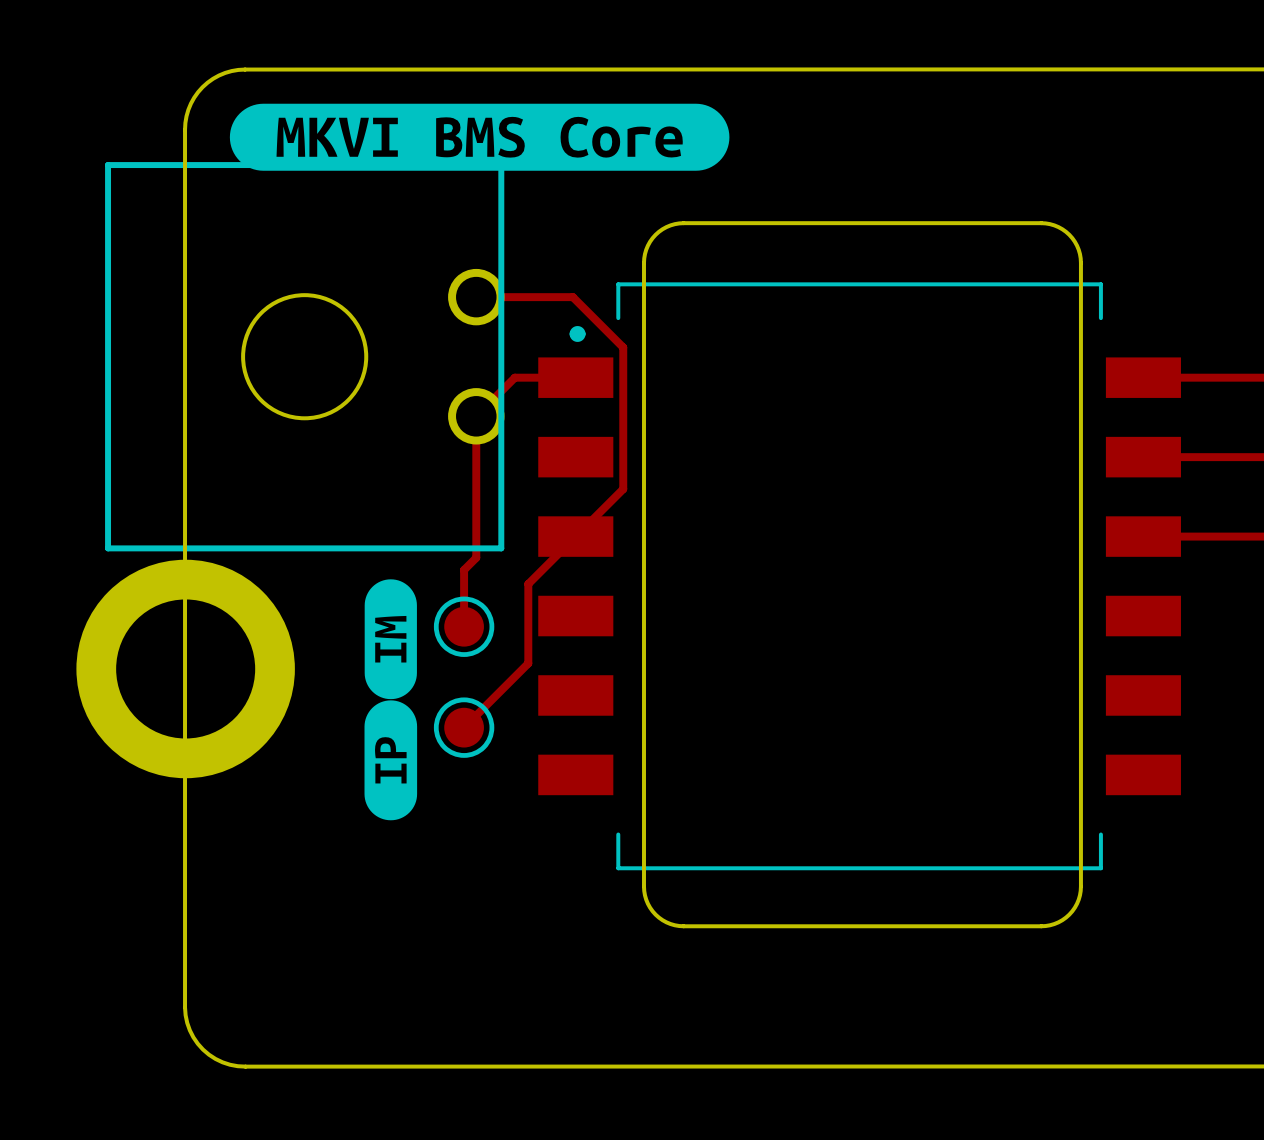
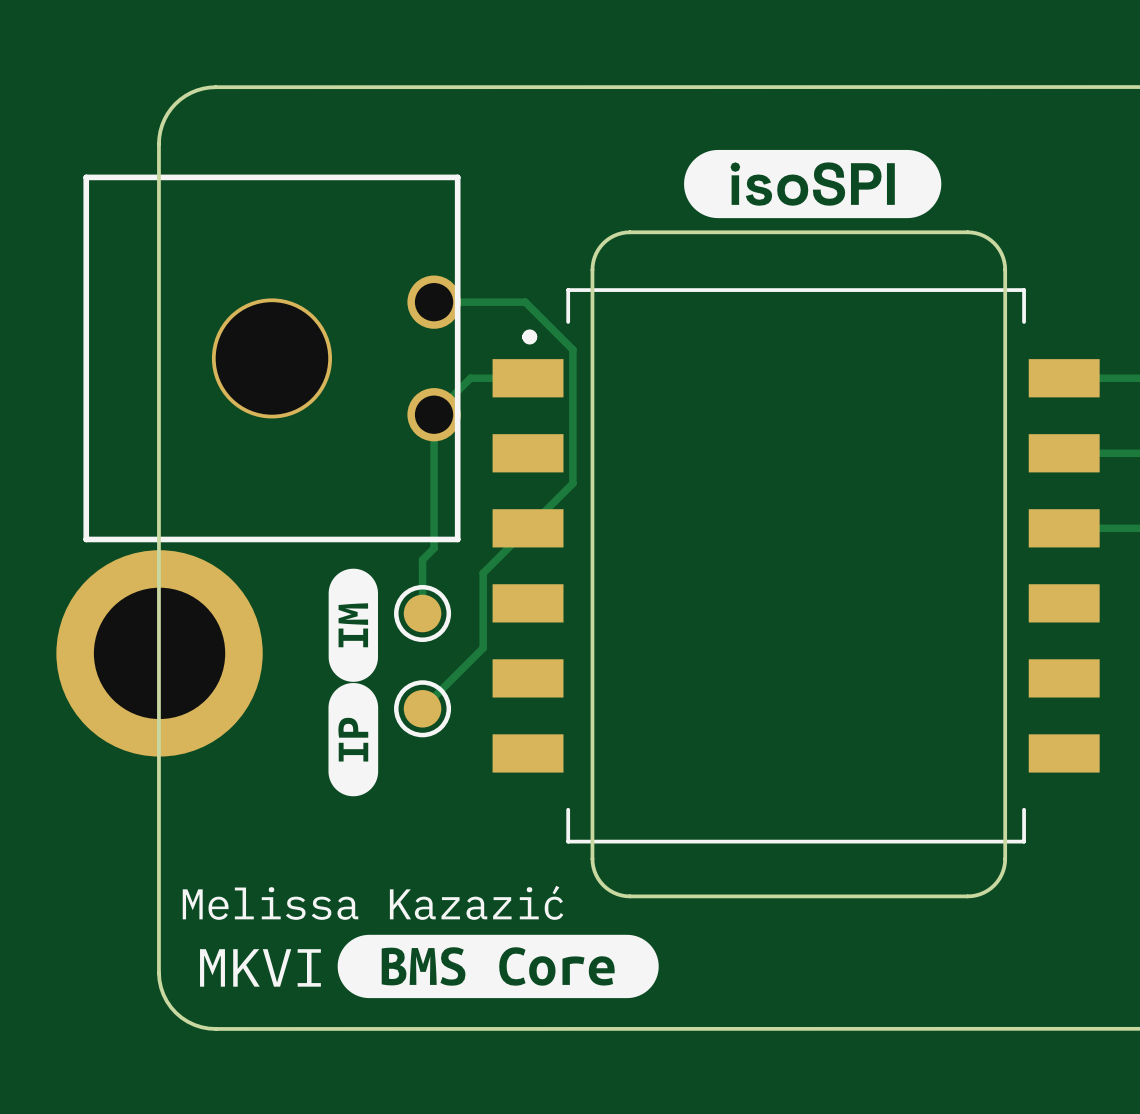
drawing: [229, 103, 730, 171] -> none
drawing: none -> [684, 149, 942, 219]
text: none -> Melissa Kazazić (372, 902)
drawing: none -> [337, 934, 659, 999]
text: none -> MKVI (260, 967)

